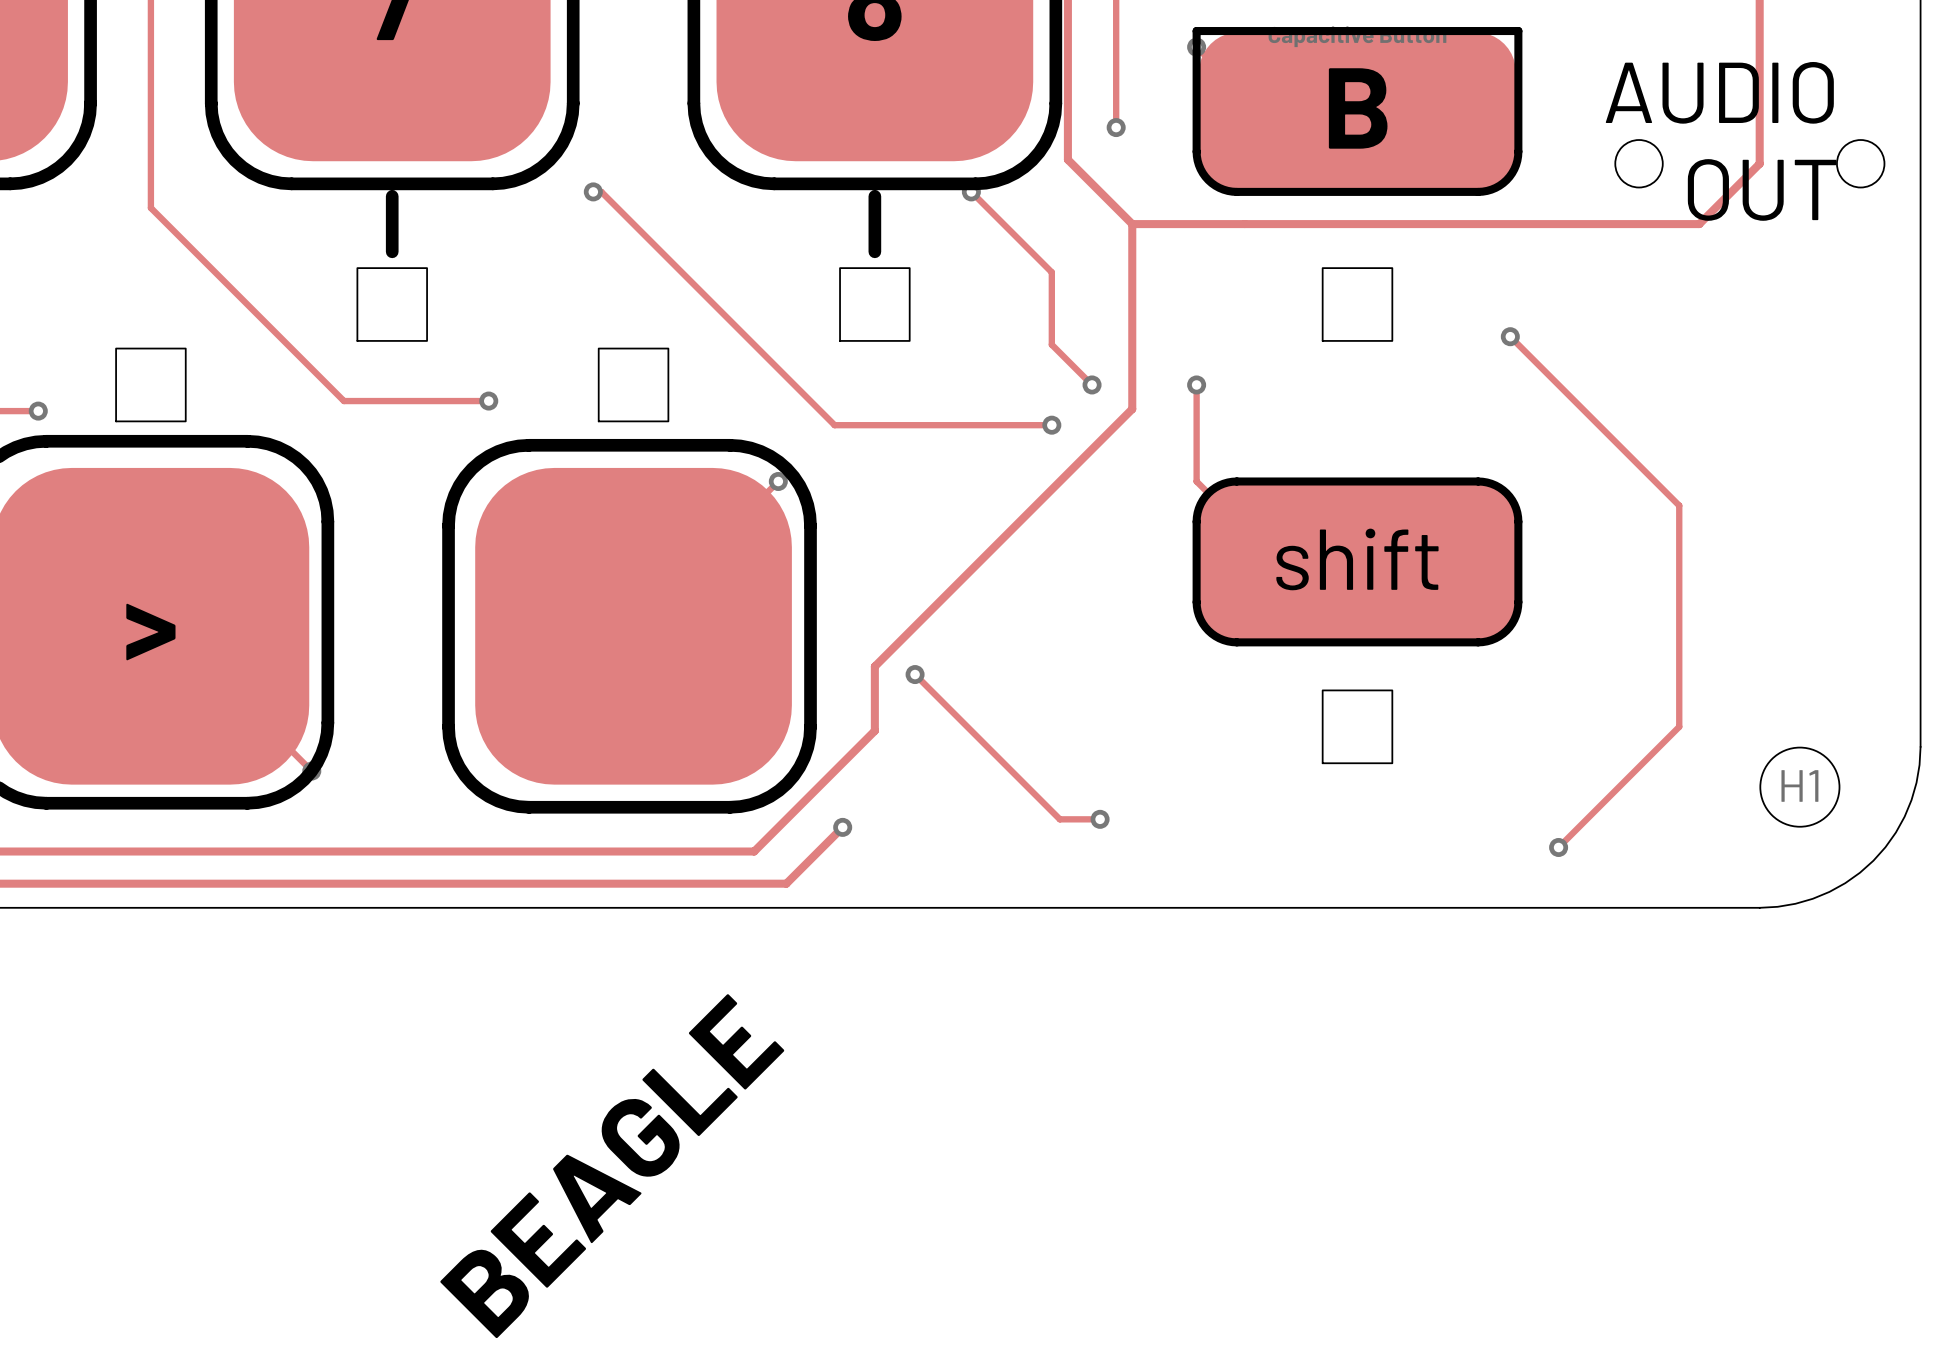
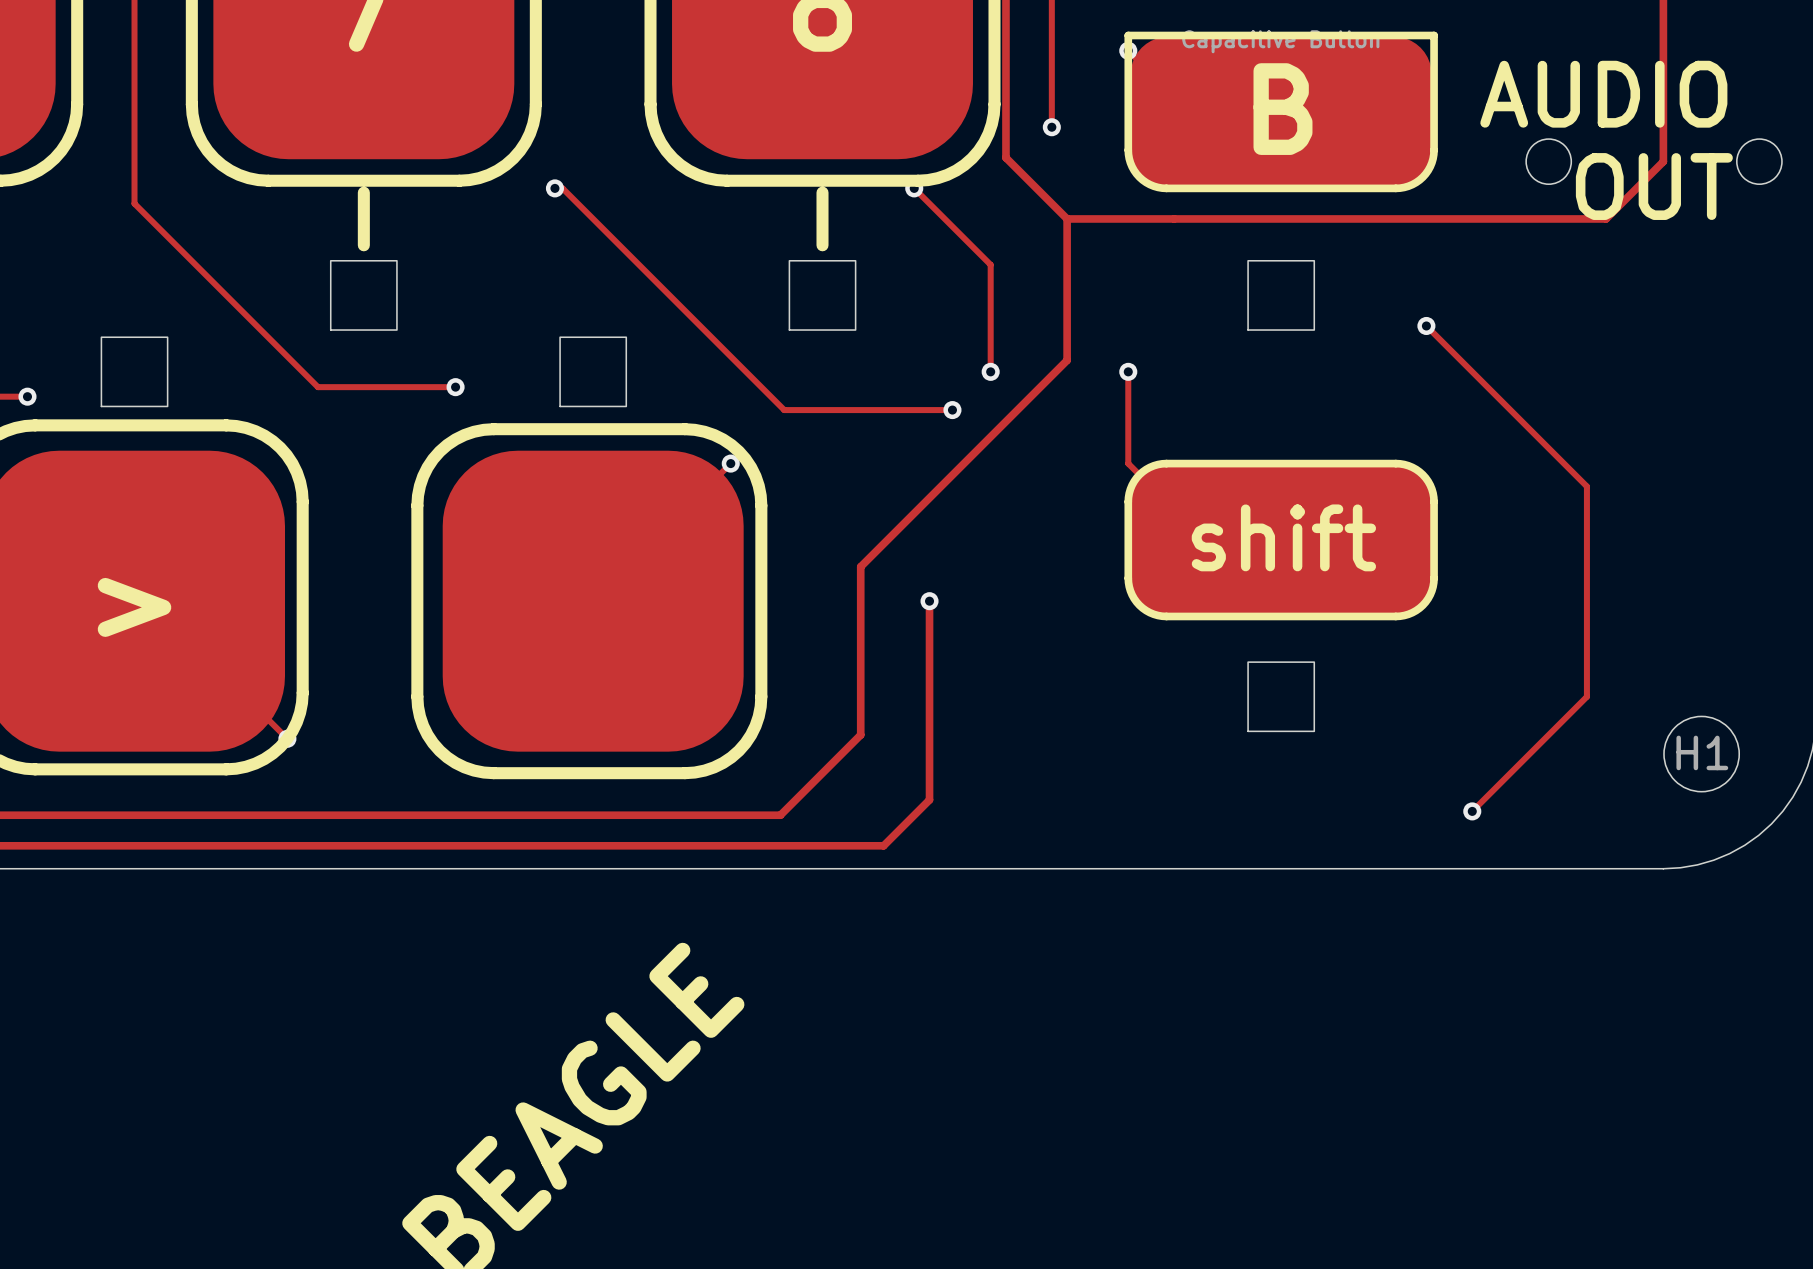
track: (1051, 344) (1092, 384) -> (990, 333) (990, 371)
track: (1132, 372) (1132, 409) (874, 666) (874, 730) (754, 851) -> (1067, 360) (860, 566) (860, 734) (780, 815) (707, 815)
via: none -> (990, 371)
via: (1092, 384) -> none
track: (1011, 425) (1051, 425) -> none
via: none -> (952, 410)
via: (1051, 425) -> none
track: (915, 674) (1059, 819) (1100, 819) -> none
via position: (915, 674) -> (929, 601)
via: (1100, 819) -> none
track: (842, 827) (786, 883) -> (929, 601) (929, 799) (883, 845) (738, 845)
via: (842, 827) -> none

